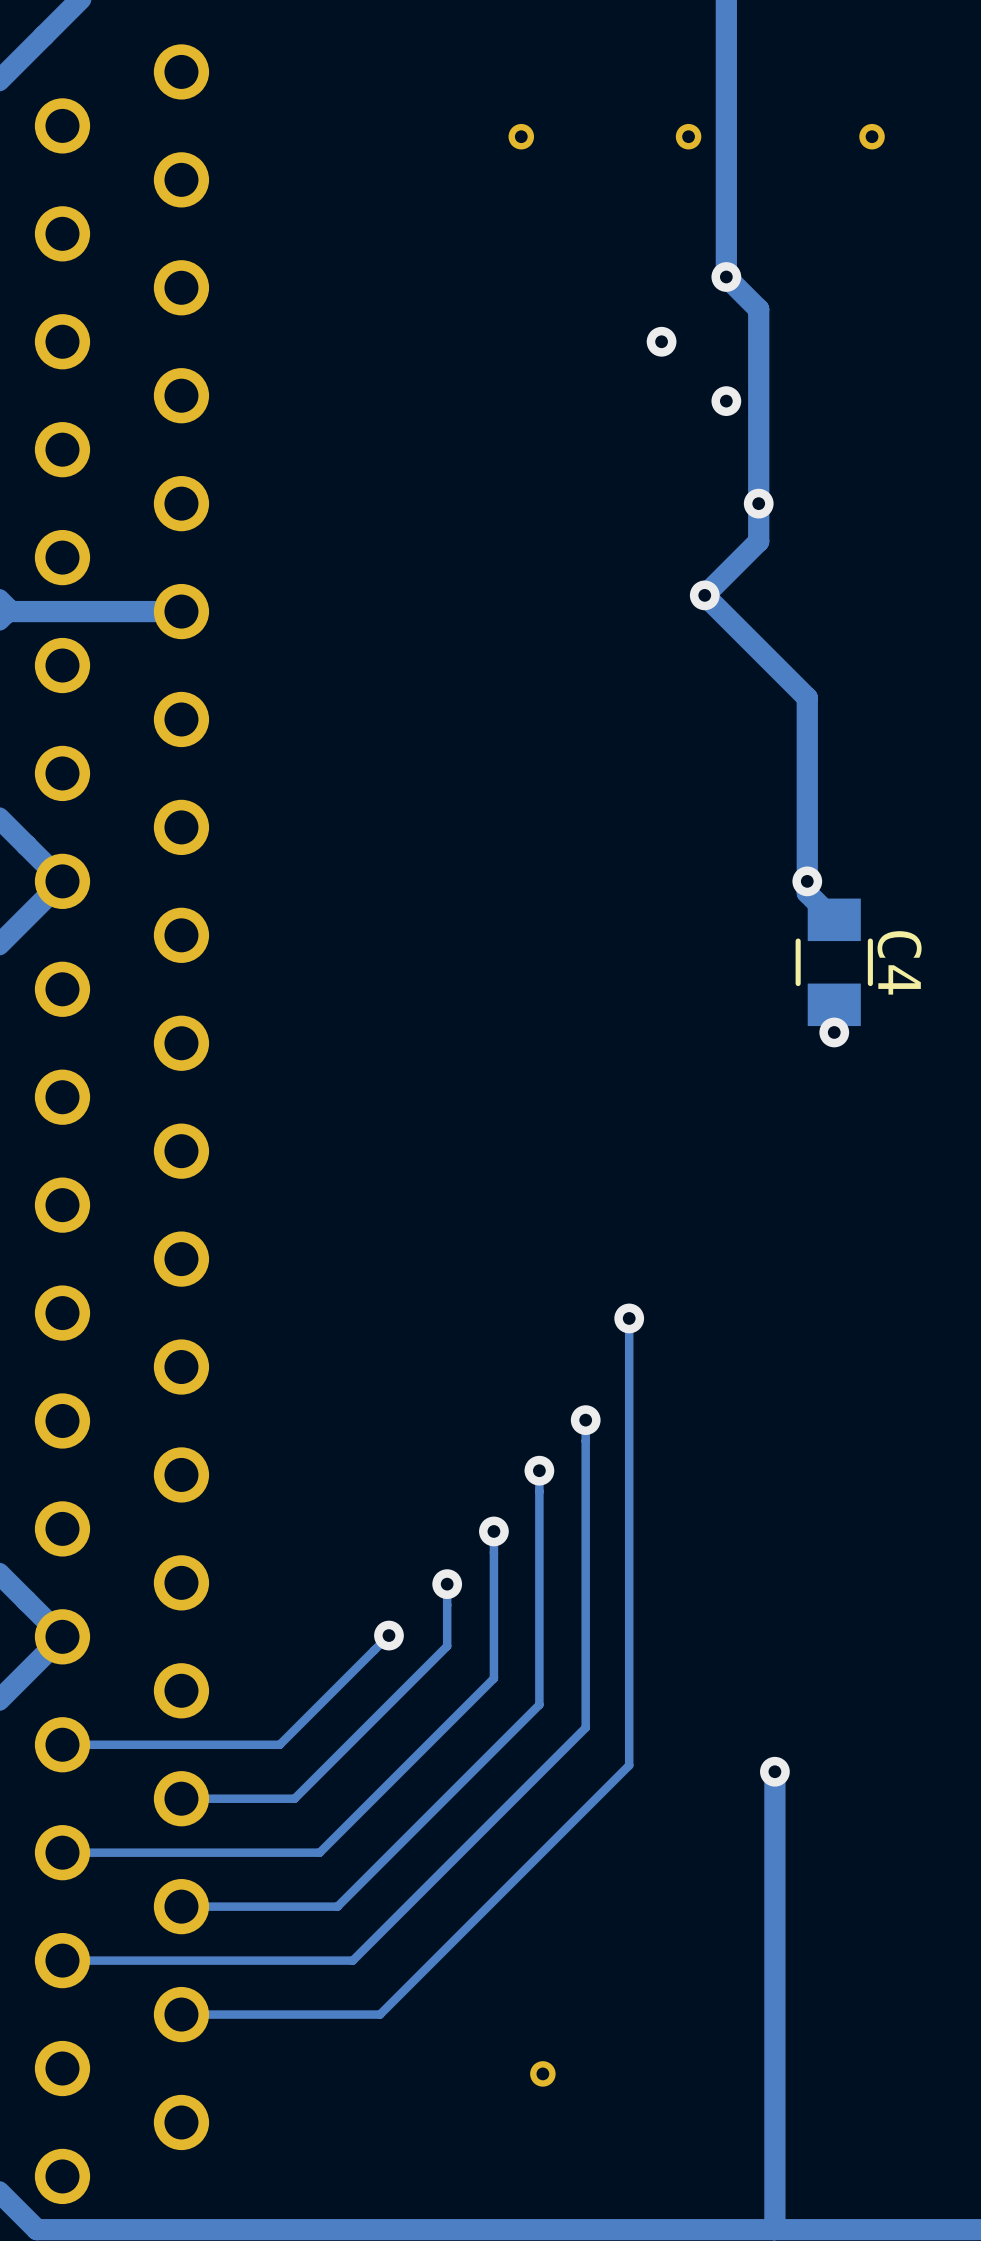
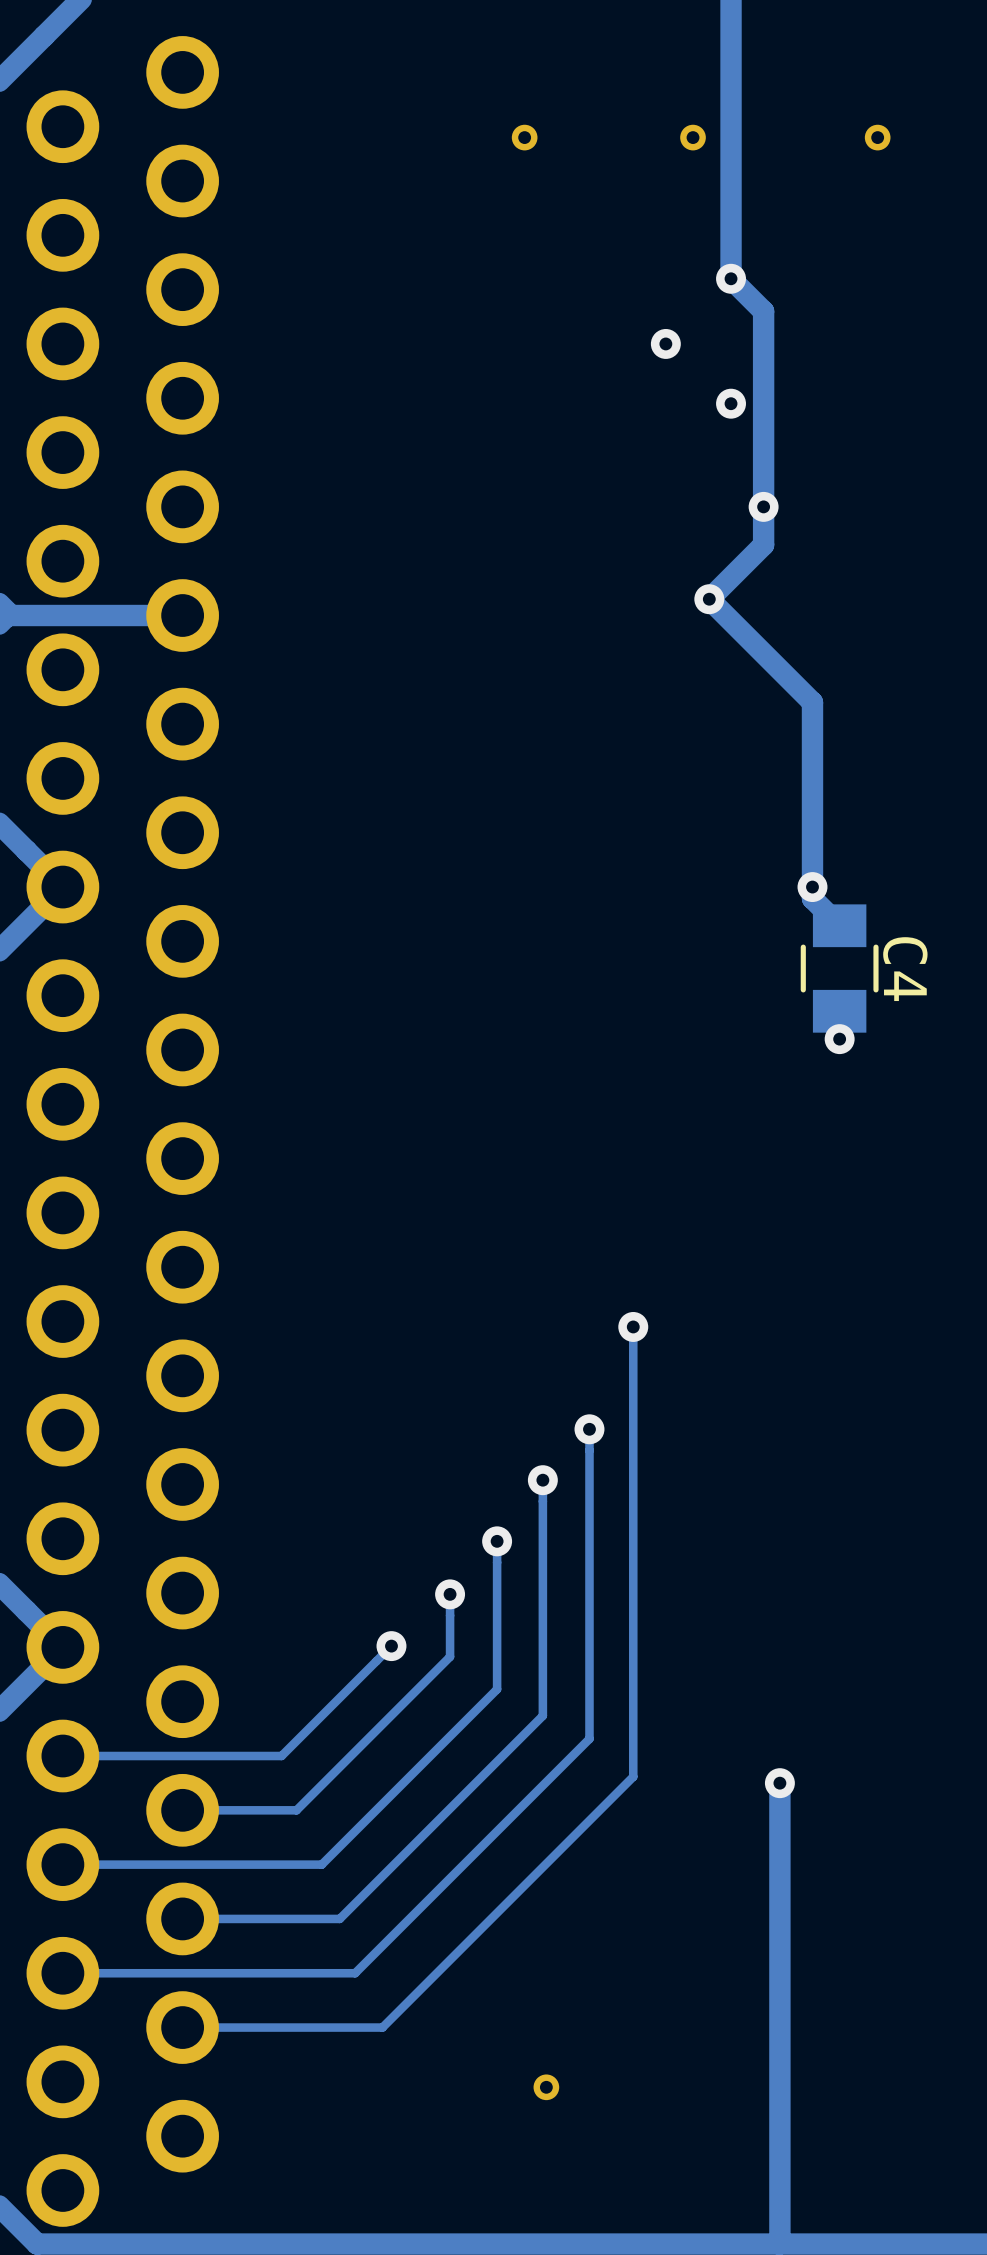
part footprint: [34, 44, 210, 2205] -> [26, 36, 219, 2227]

